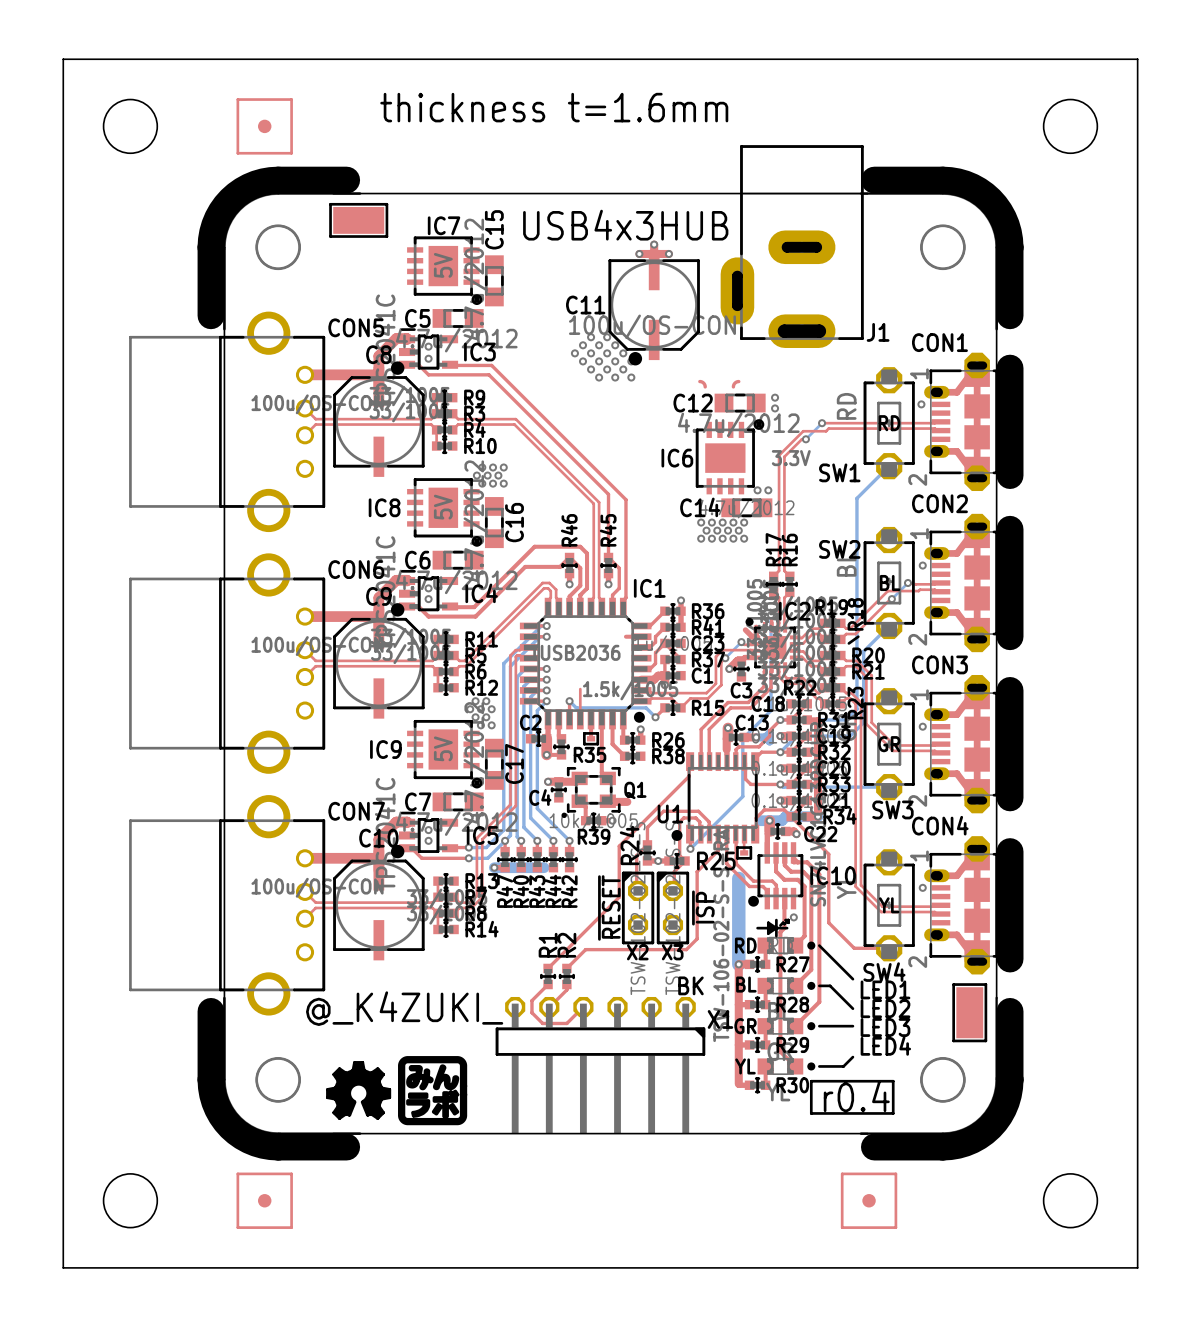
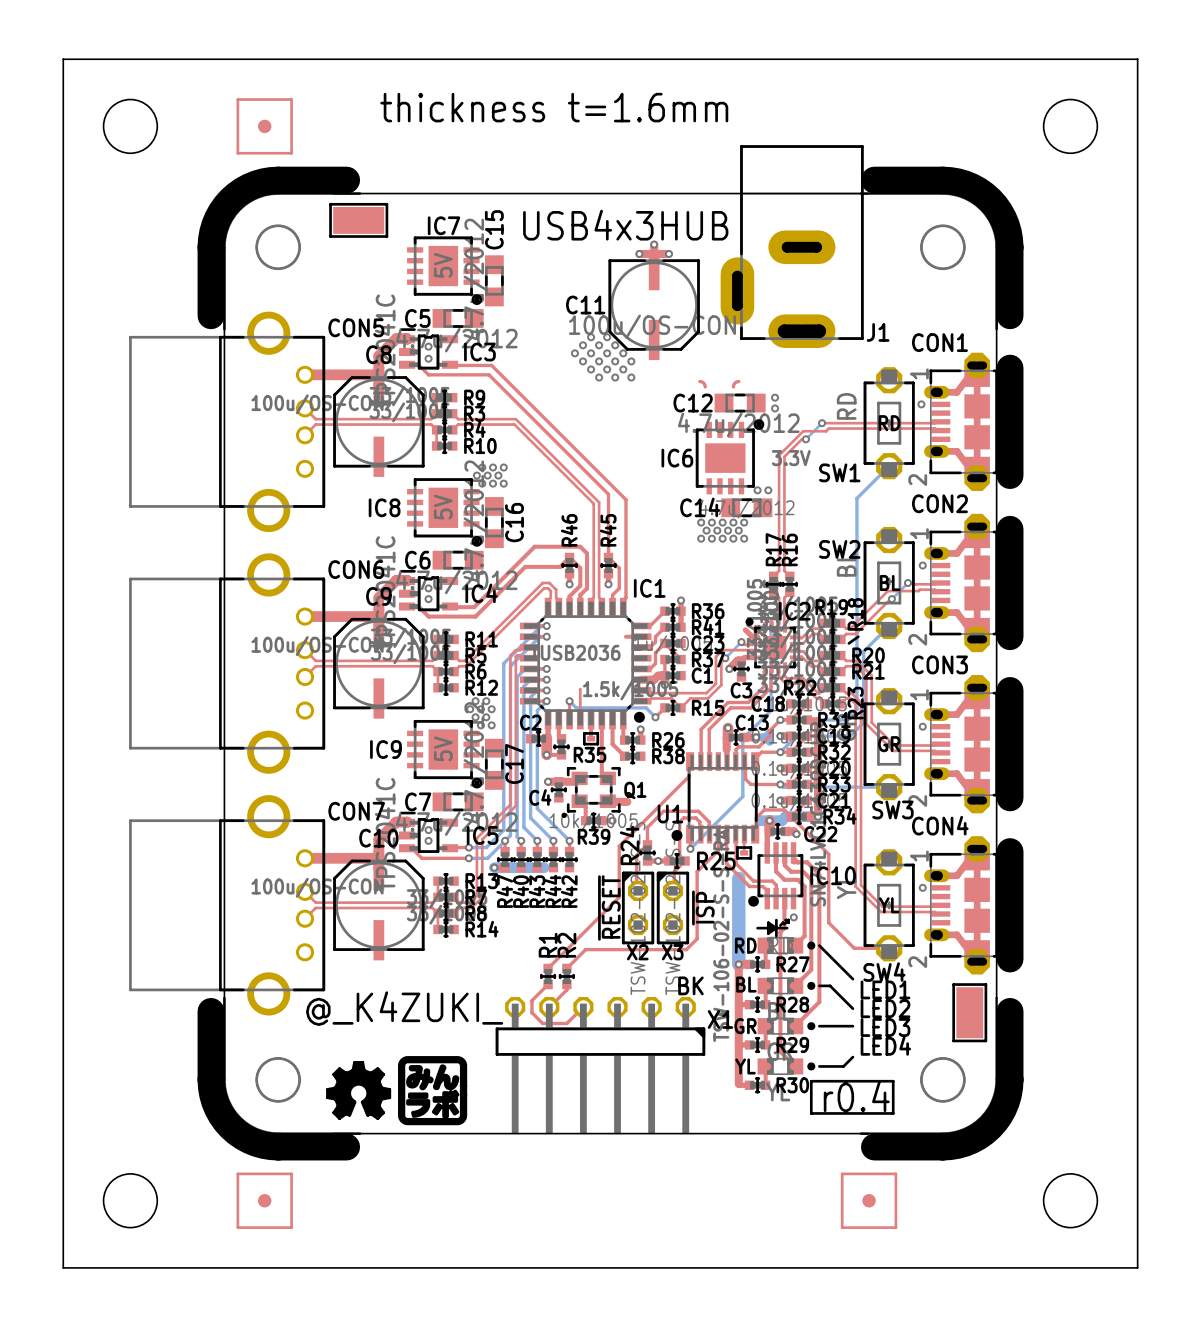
C11 footprint: [608, 249, 700, 366] -> [608, 249, 700, 361]
C8 footprint: [333, 361, 425, 477] -> [333, 366, 425, 477]
C9 footprint: [333, 603, 425, 719] -> [333, 608, 425, 719]
C10 footprint: [333, 844, 425, 961] -> [333, 850, 425, 961]

